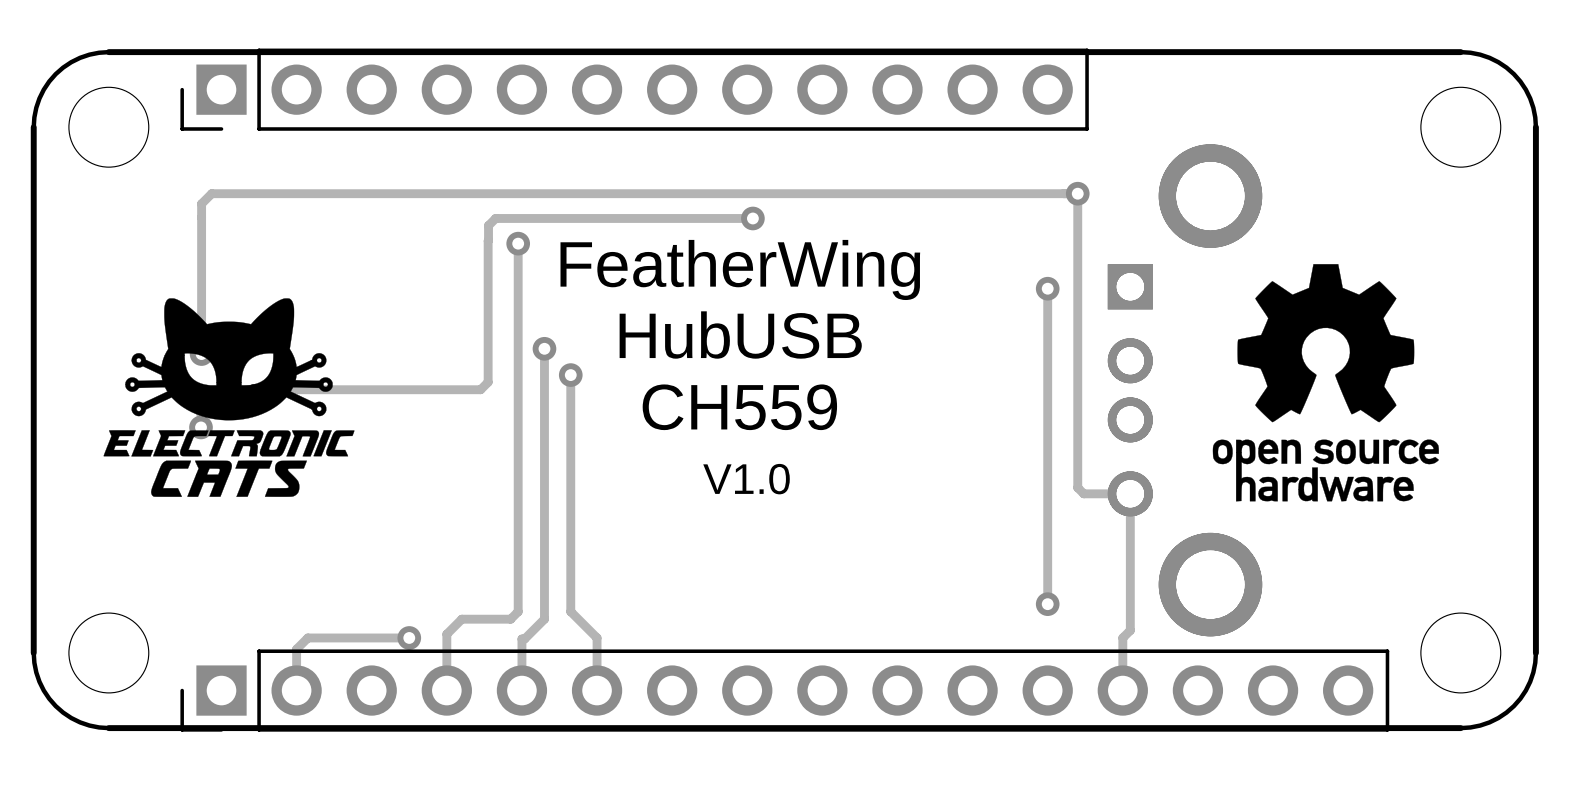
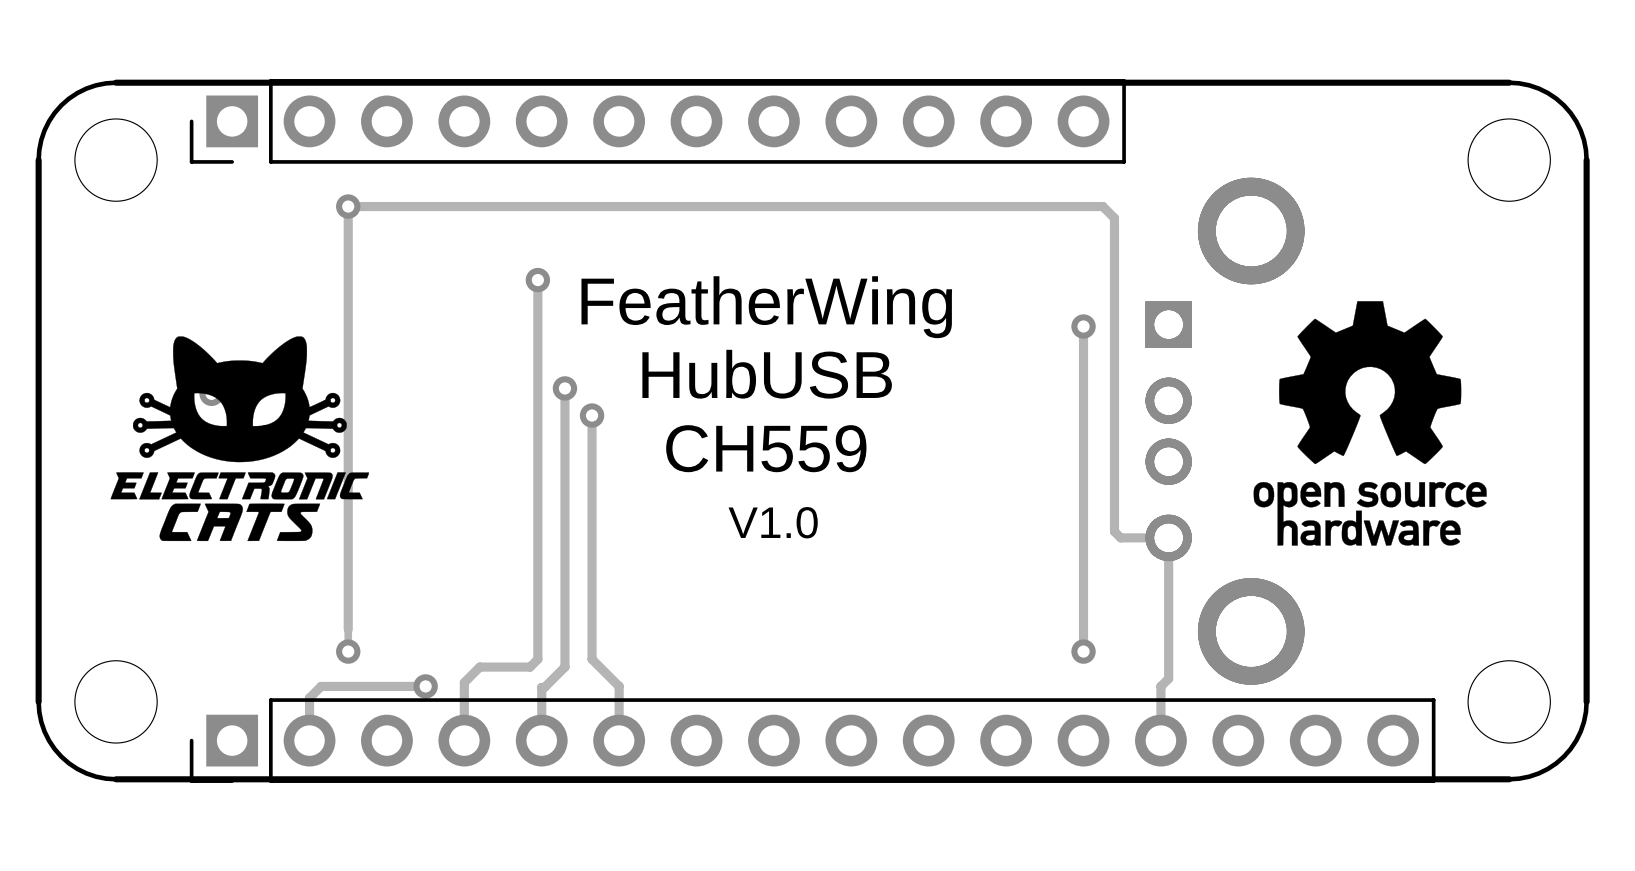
via: none -> (348, 206)
track: (1077, 193) (211, 193) (201, 203) (201, 354) -> (1114, 228) (1114, 218) (1102, 206) (348, 206) (348, 651)
via: (1077, 193) -> none
track: (752, 218) (495, 218) (488, 225) (488, 240) -> none
via: (752, 218) -> none
track: (488, 240) (488, 382) (480, 389) (219, 389) (201, 407) (201, 427) -> none
via: (201, 427) -> none
via: none -> (348, 651)

